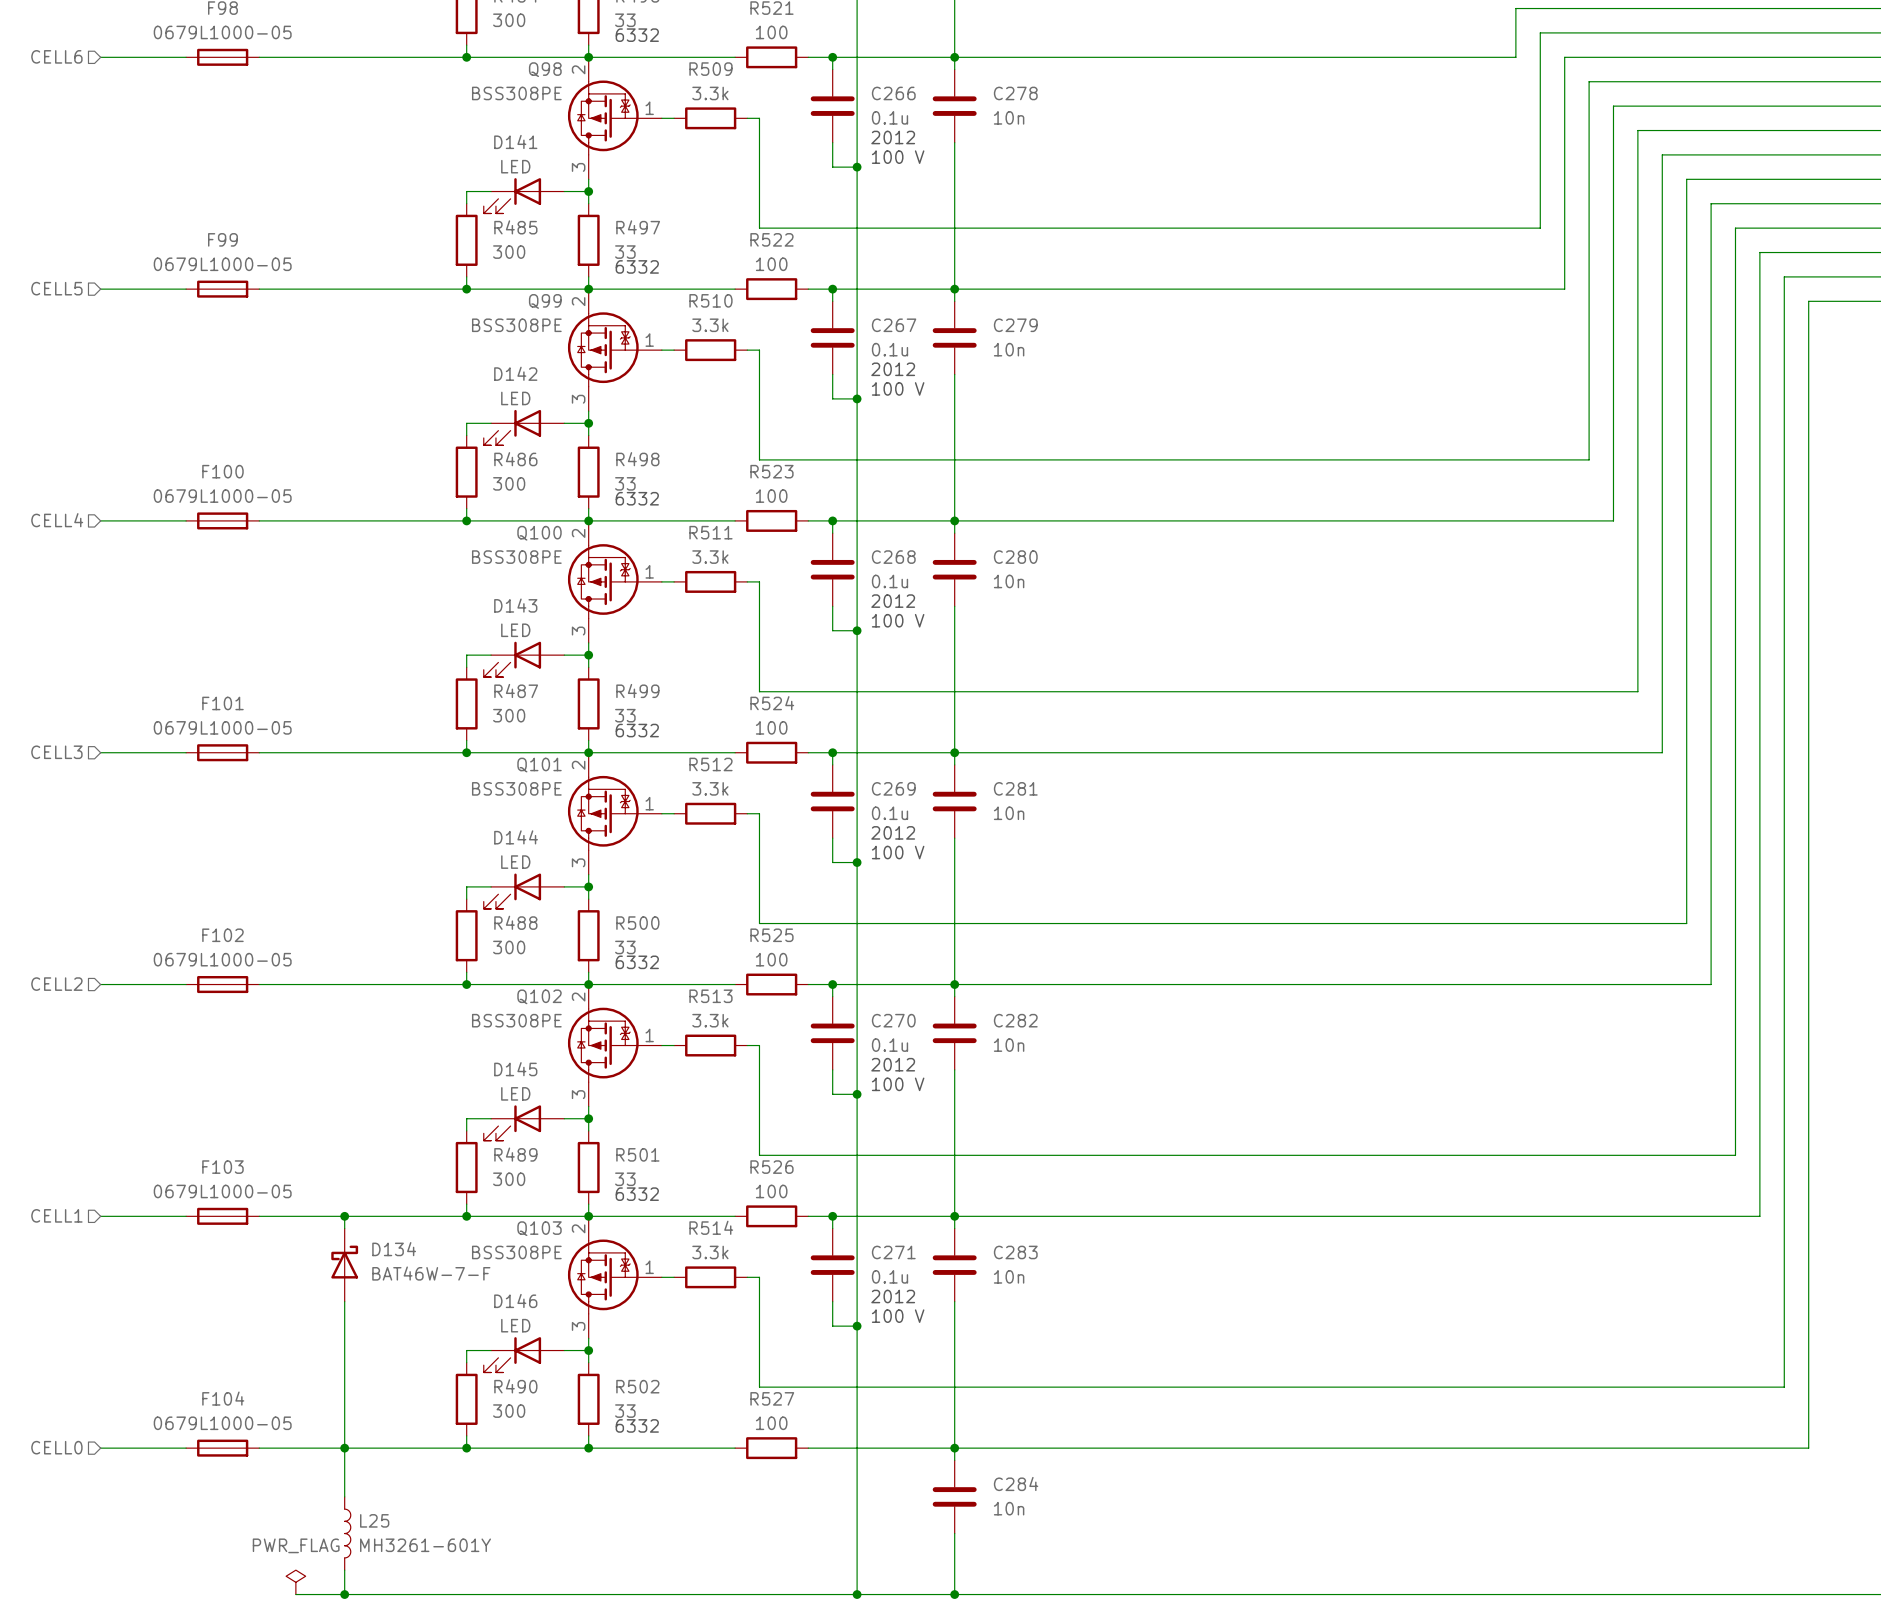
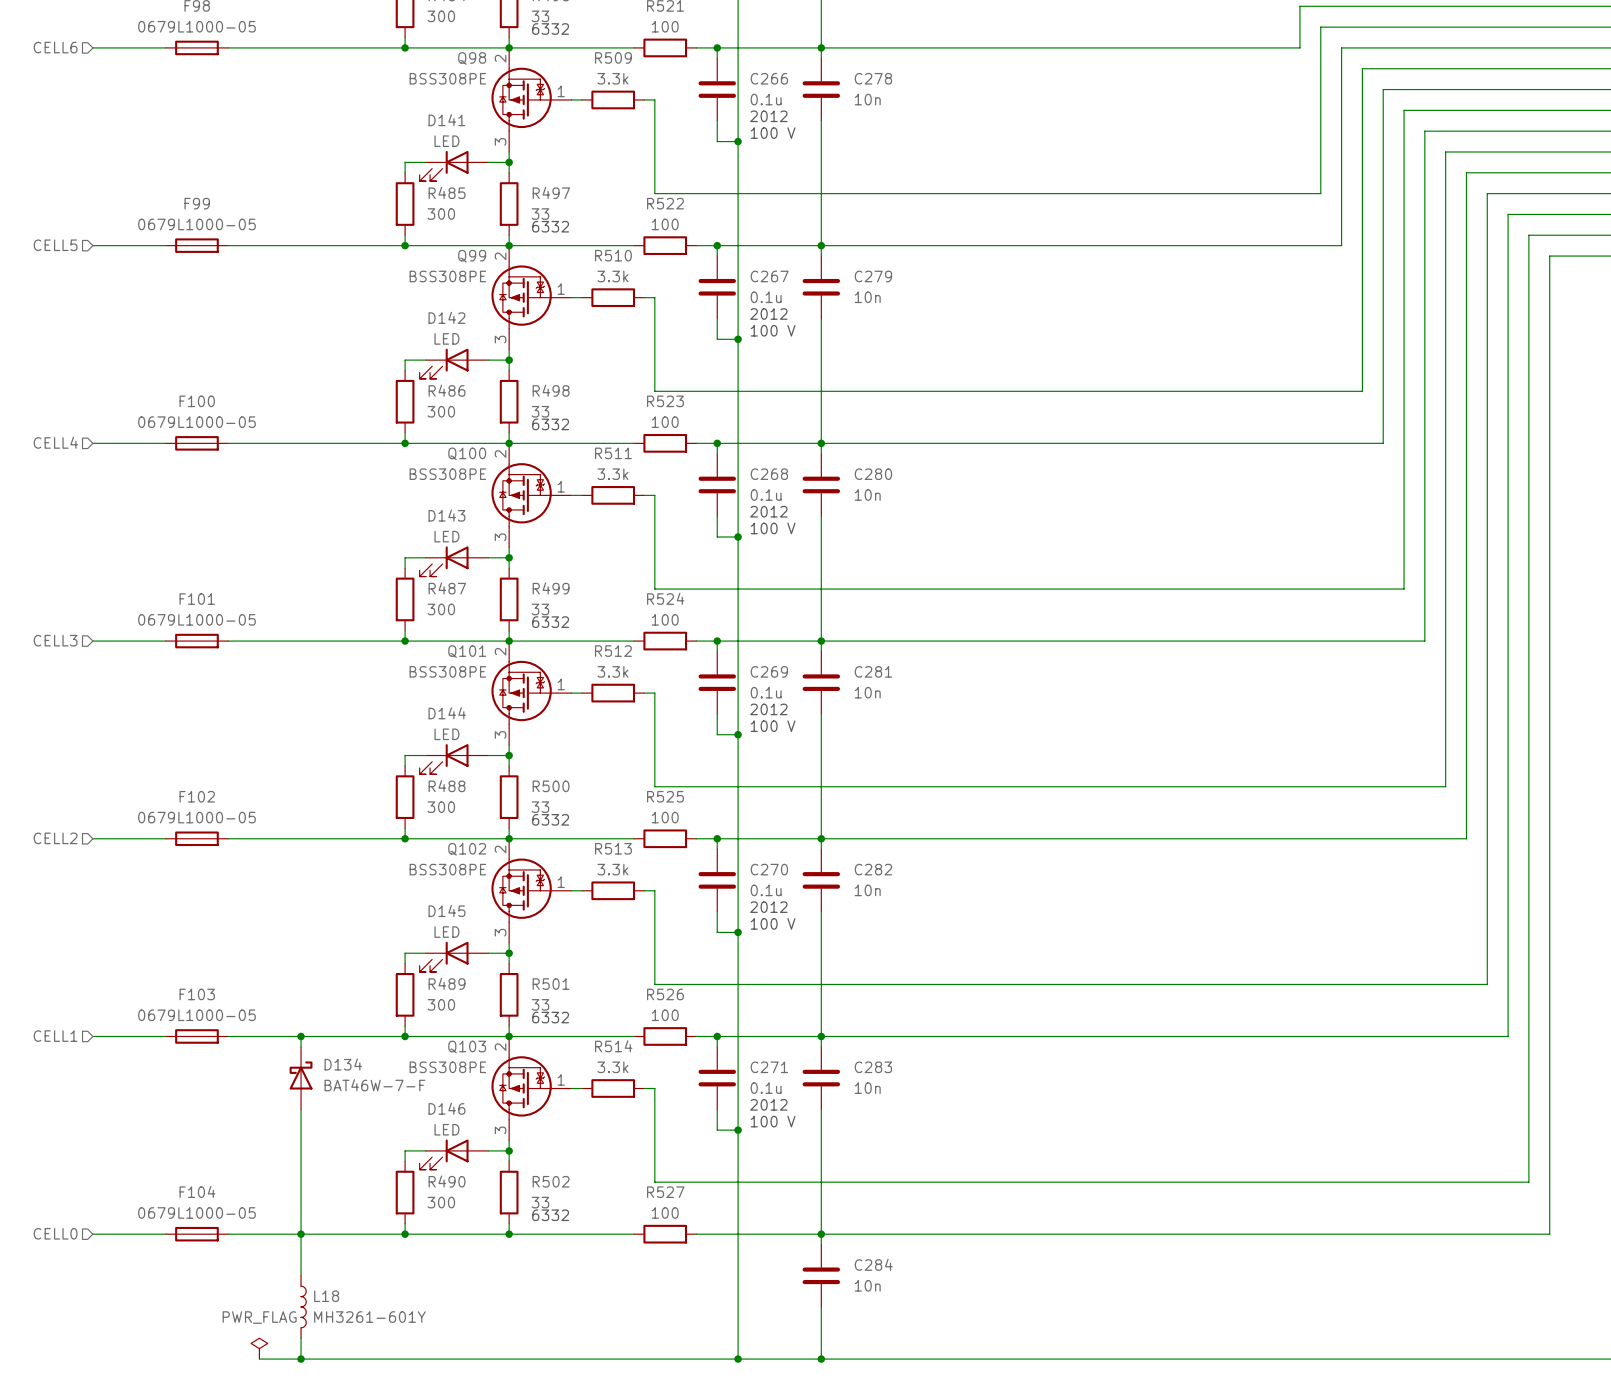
L25 name: L25 (374, 1520) -> L18 (326, 1296)

